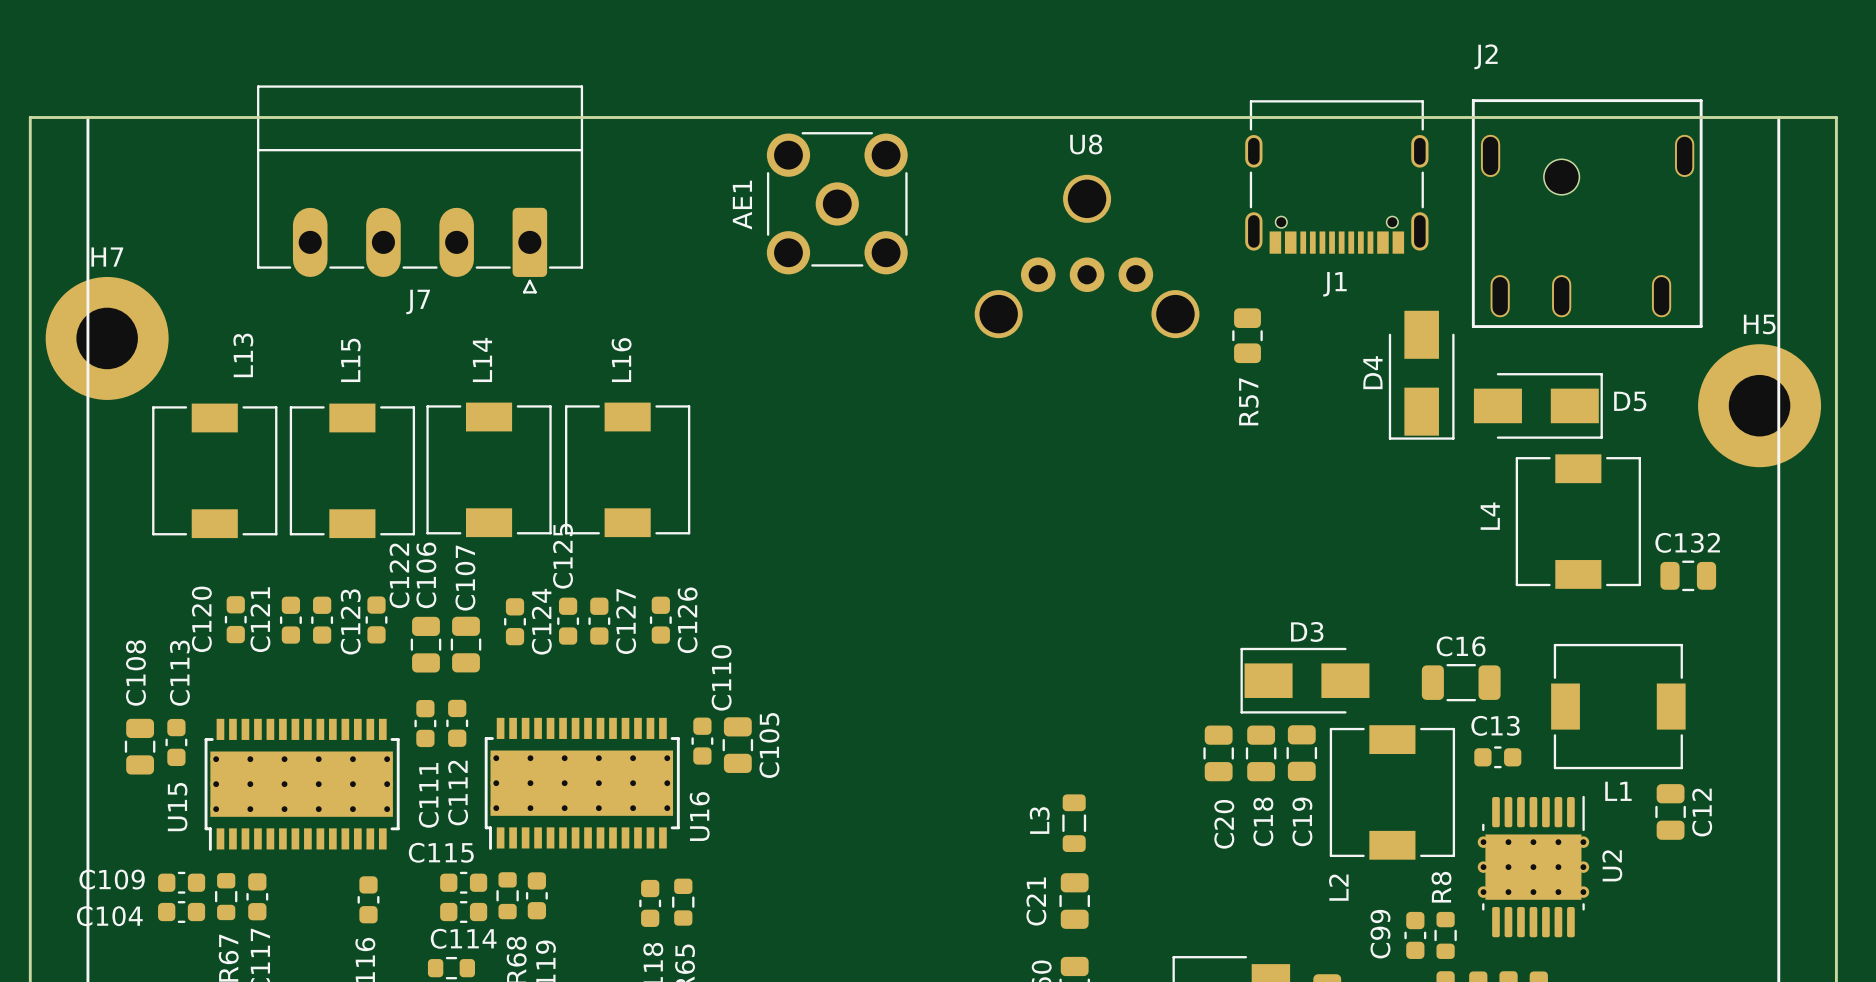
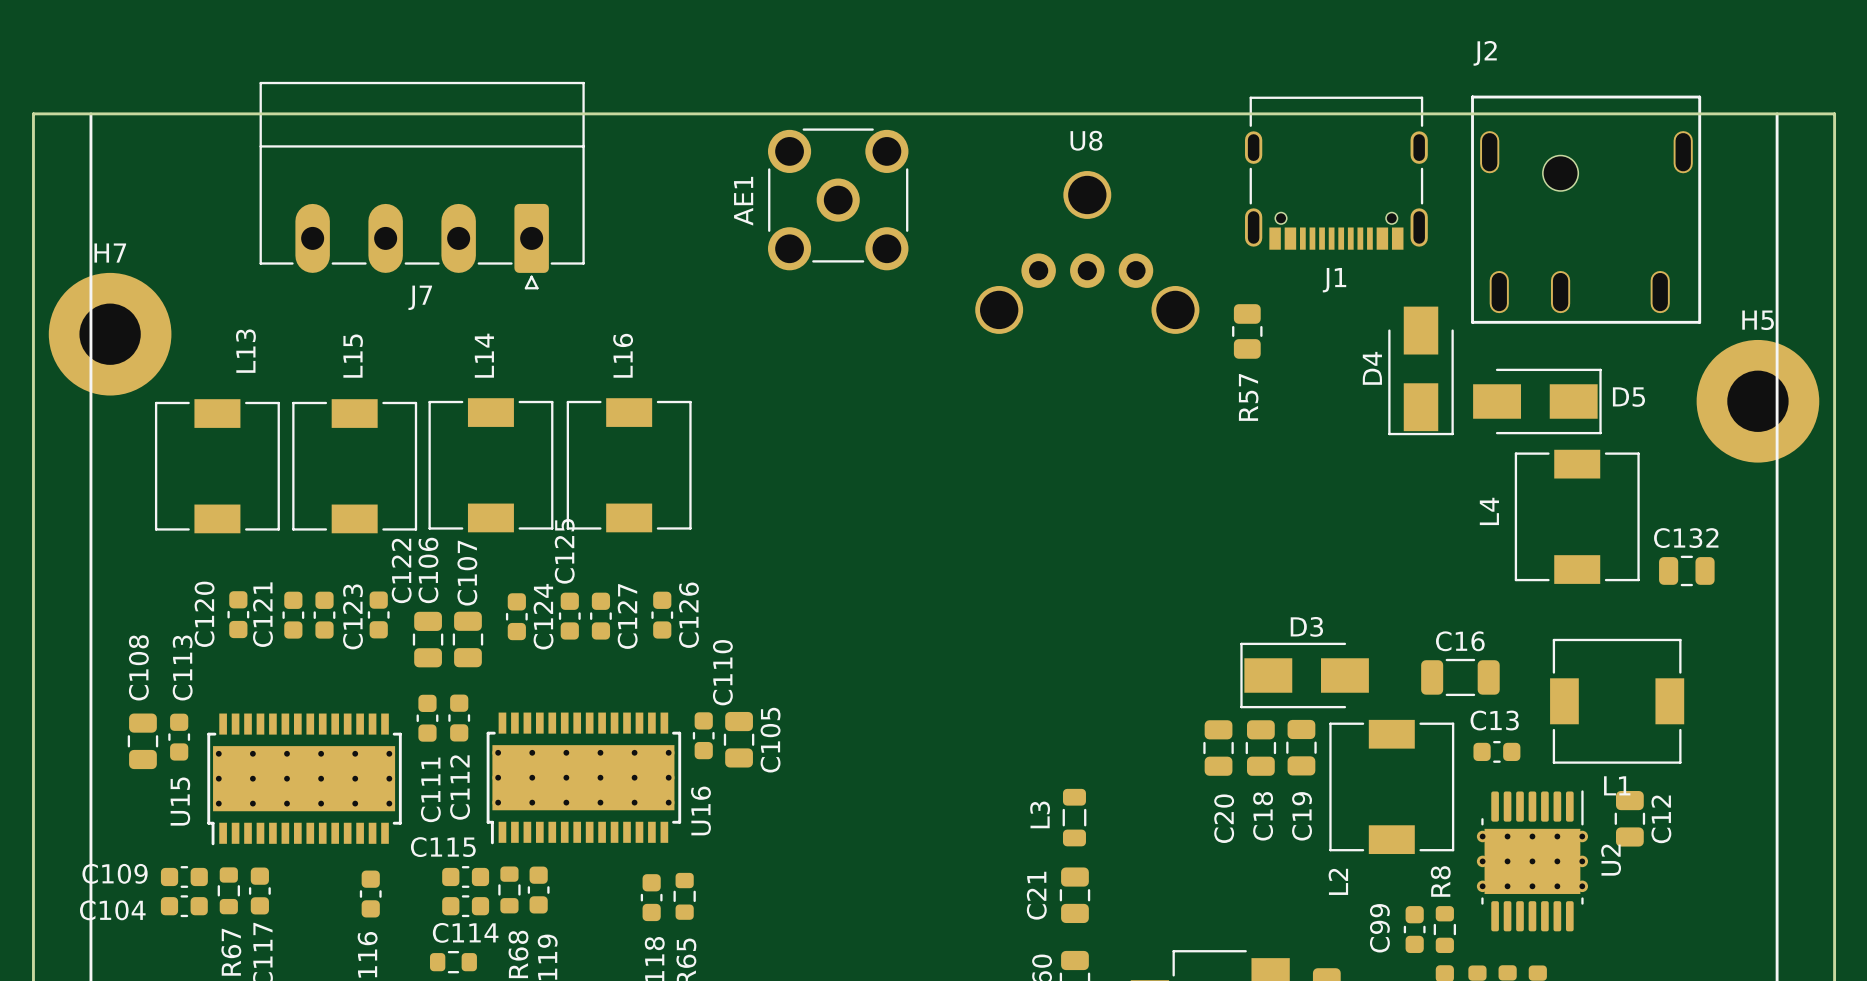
C12 position: (1670, 811) -> (1629, 818)

